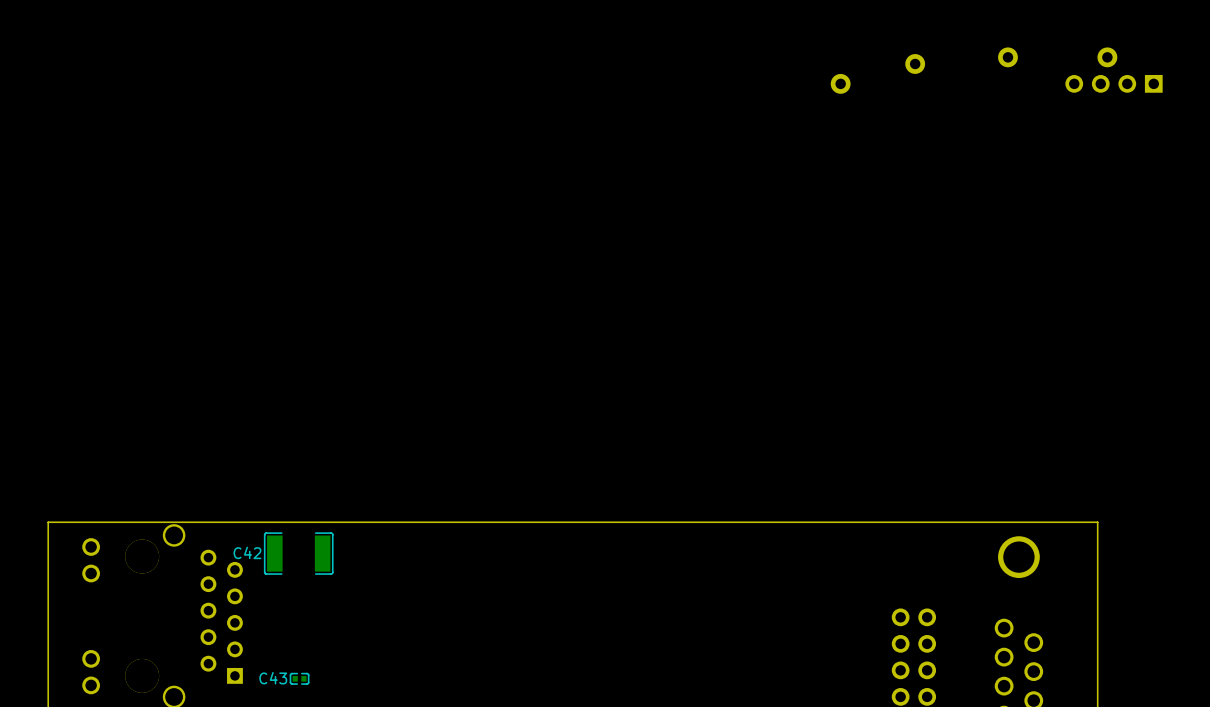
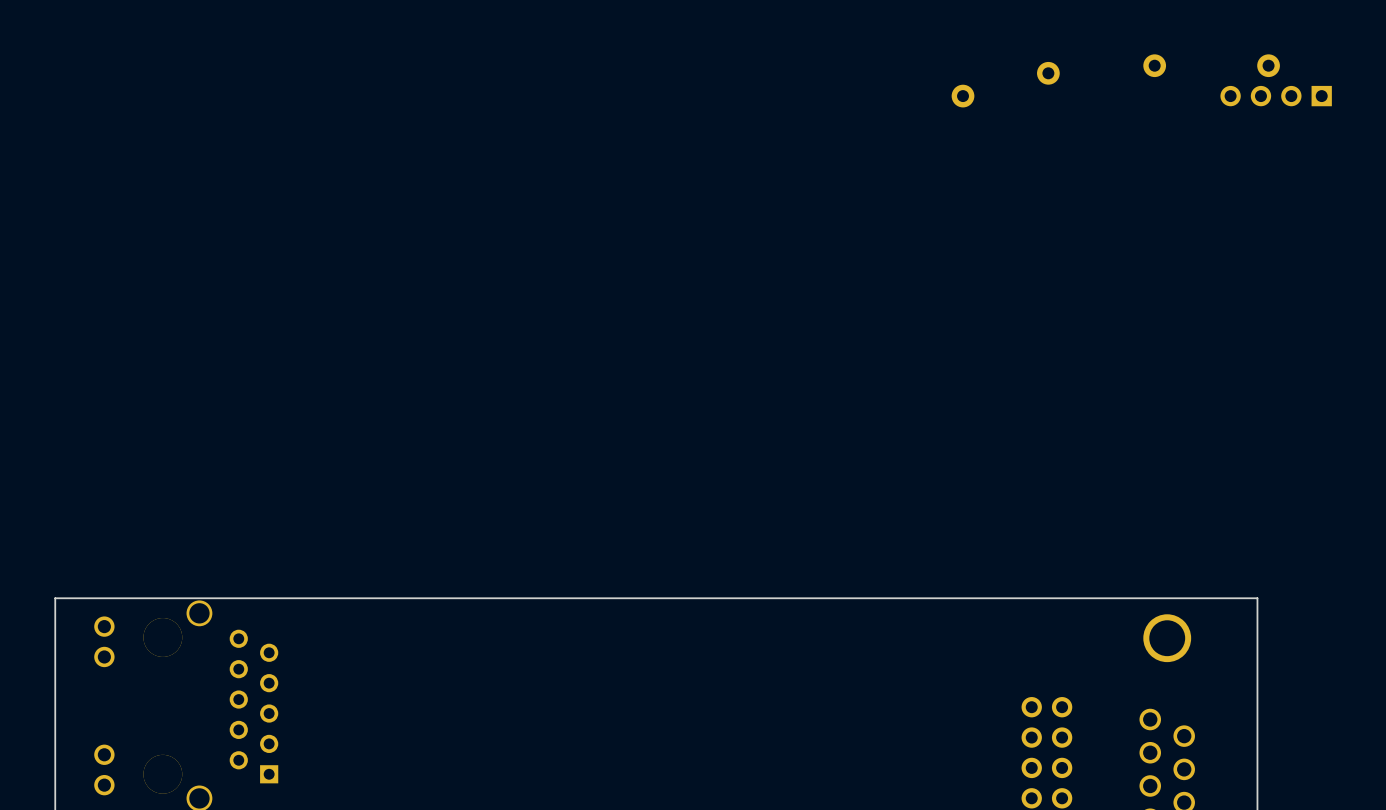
C42: (298, 553) -> none
C43: (299, 678) -> none

